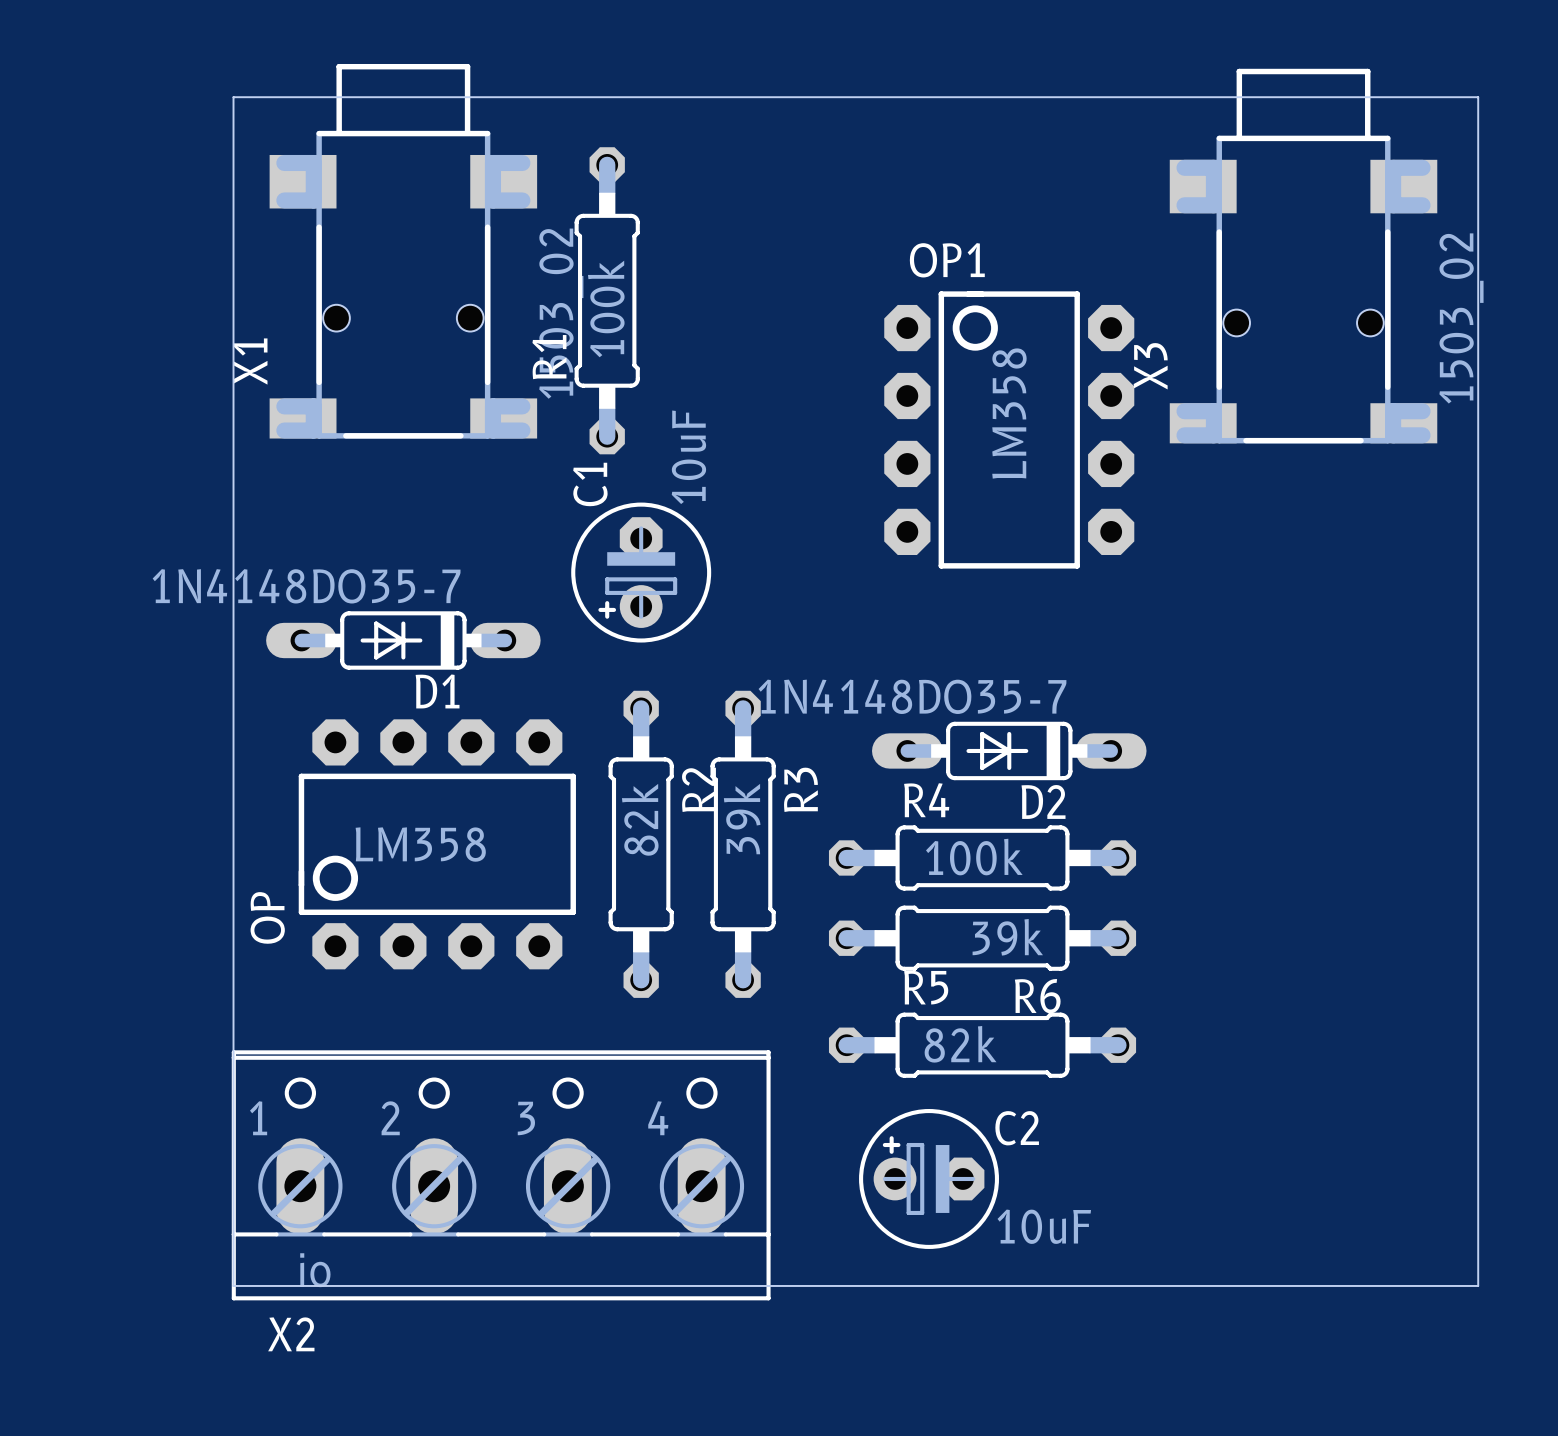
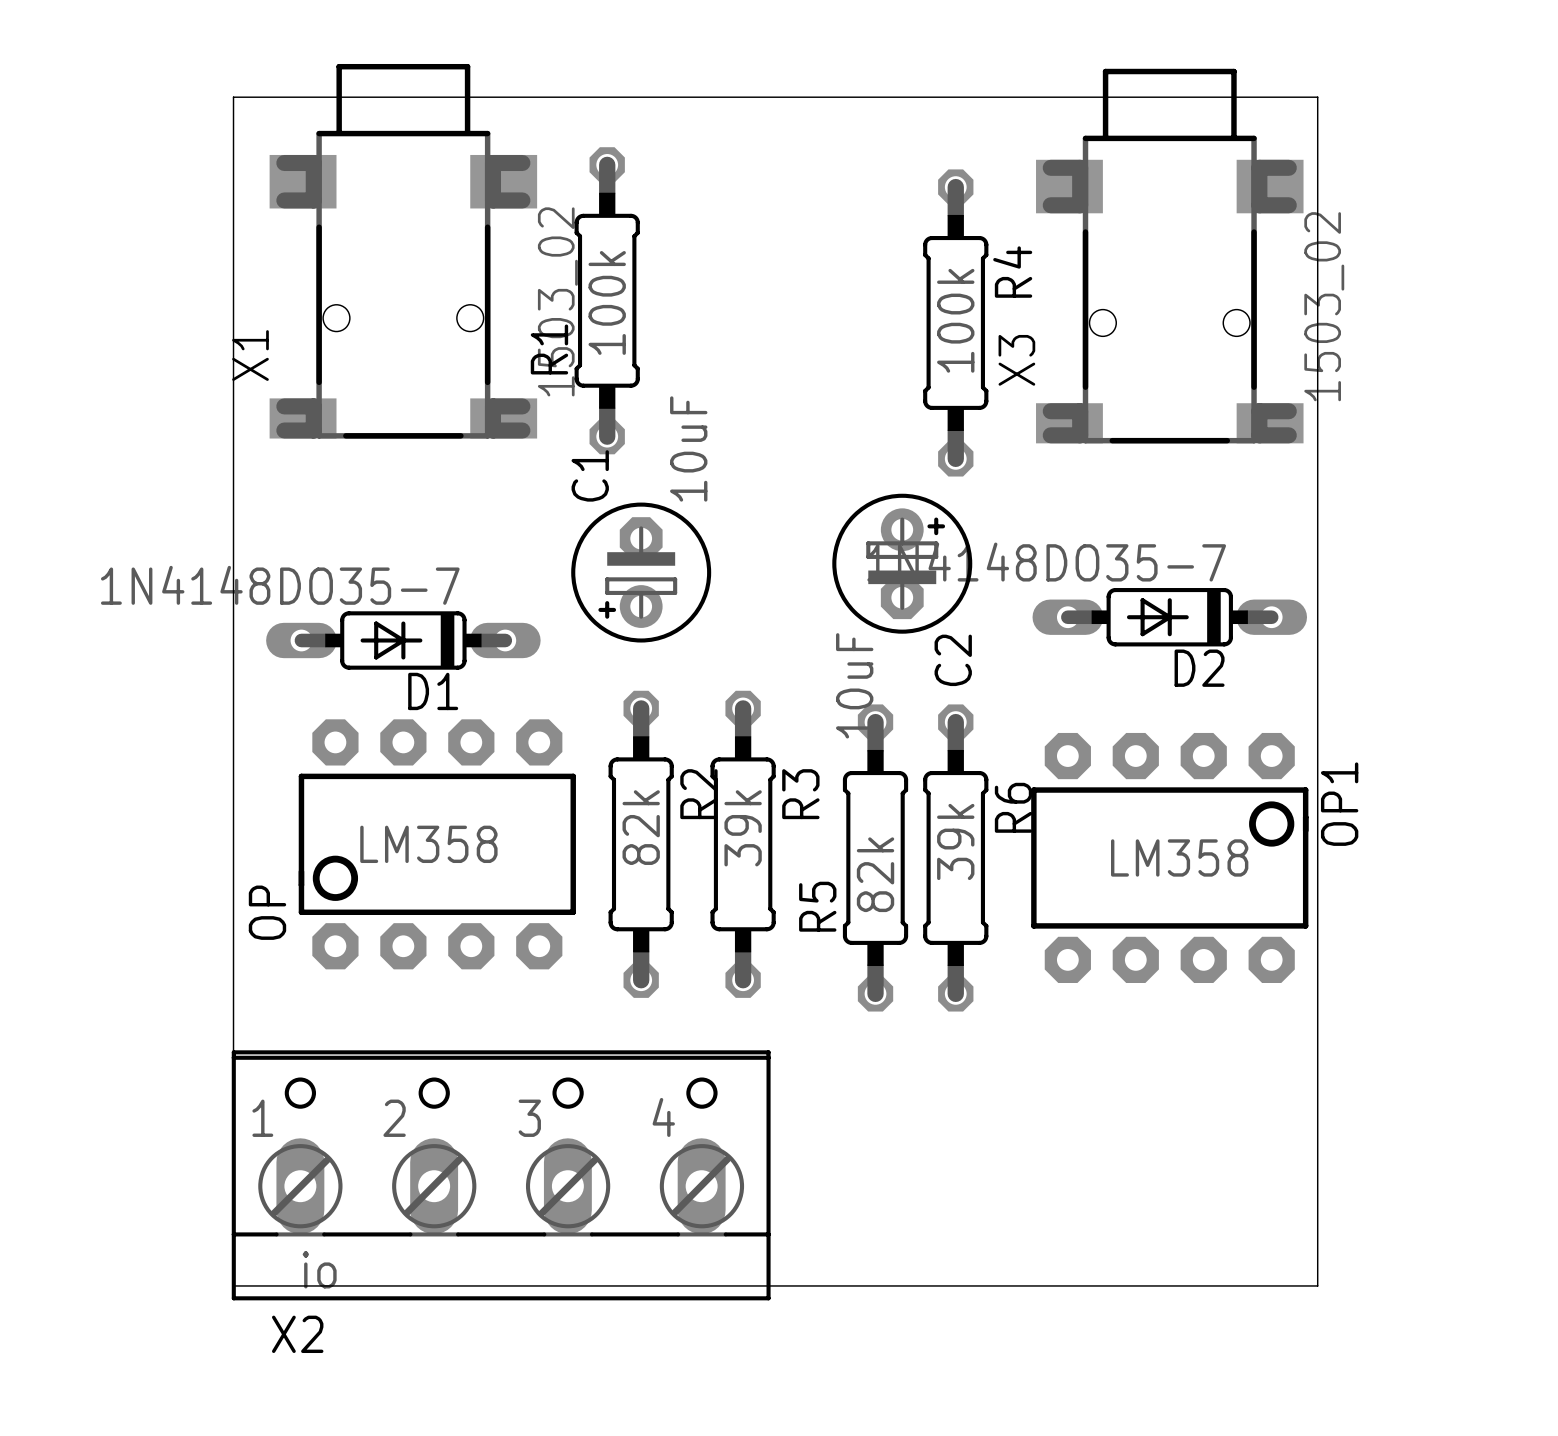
board edge: (1317, 97) (1478, 97) (1478, 1285) (1317, 1285) -> (1317, 97) (1317, 1285)
X3 position: (1303, 256) -> (1169, 256)
OP1 rotation: 0° (1009, 429) -> 90° clockwise (1169, 857)
OP1 position: (1009, 429) -> (1169, 857)
D2 position: (1009, 750) -> (1169, 617)
R4 rotation: 0° (982, 857) -> 90° clockwise (955, 322)
R4 position: (982, 857) -> (955, 322)
R6 rotation: 0° (982, 938) -> 90° clockwise (955, 857)
R5 name position: R5 (926, 987) -> R5 (817, 906)
R6 name position: R6 (1037, 996) -> R6 (1013, 807)
R5 rotation: 0° (982, 1045) -> 90° clockwise (875, 857)
R5 position: (982, 1045) -> (875, 857)
C2 rotation: 0° (929, 1178) -> 90° clockwise (902, 563)
C2 position: (929, 1178) -> (902, 563)

